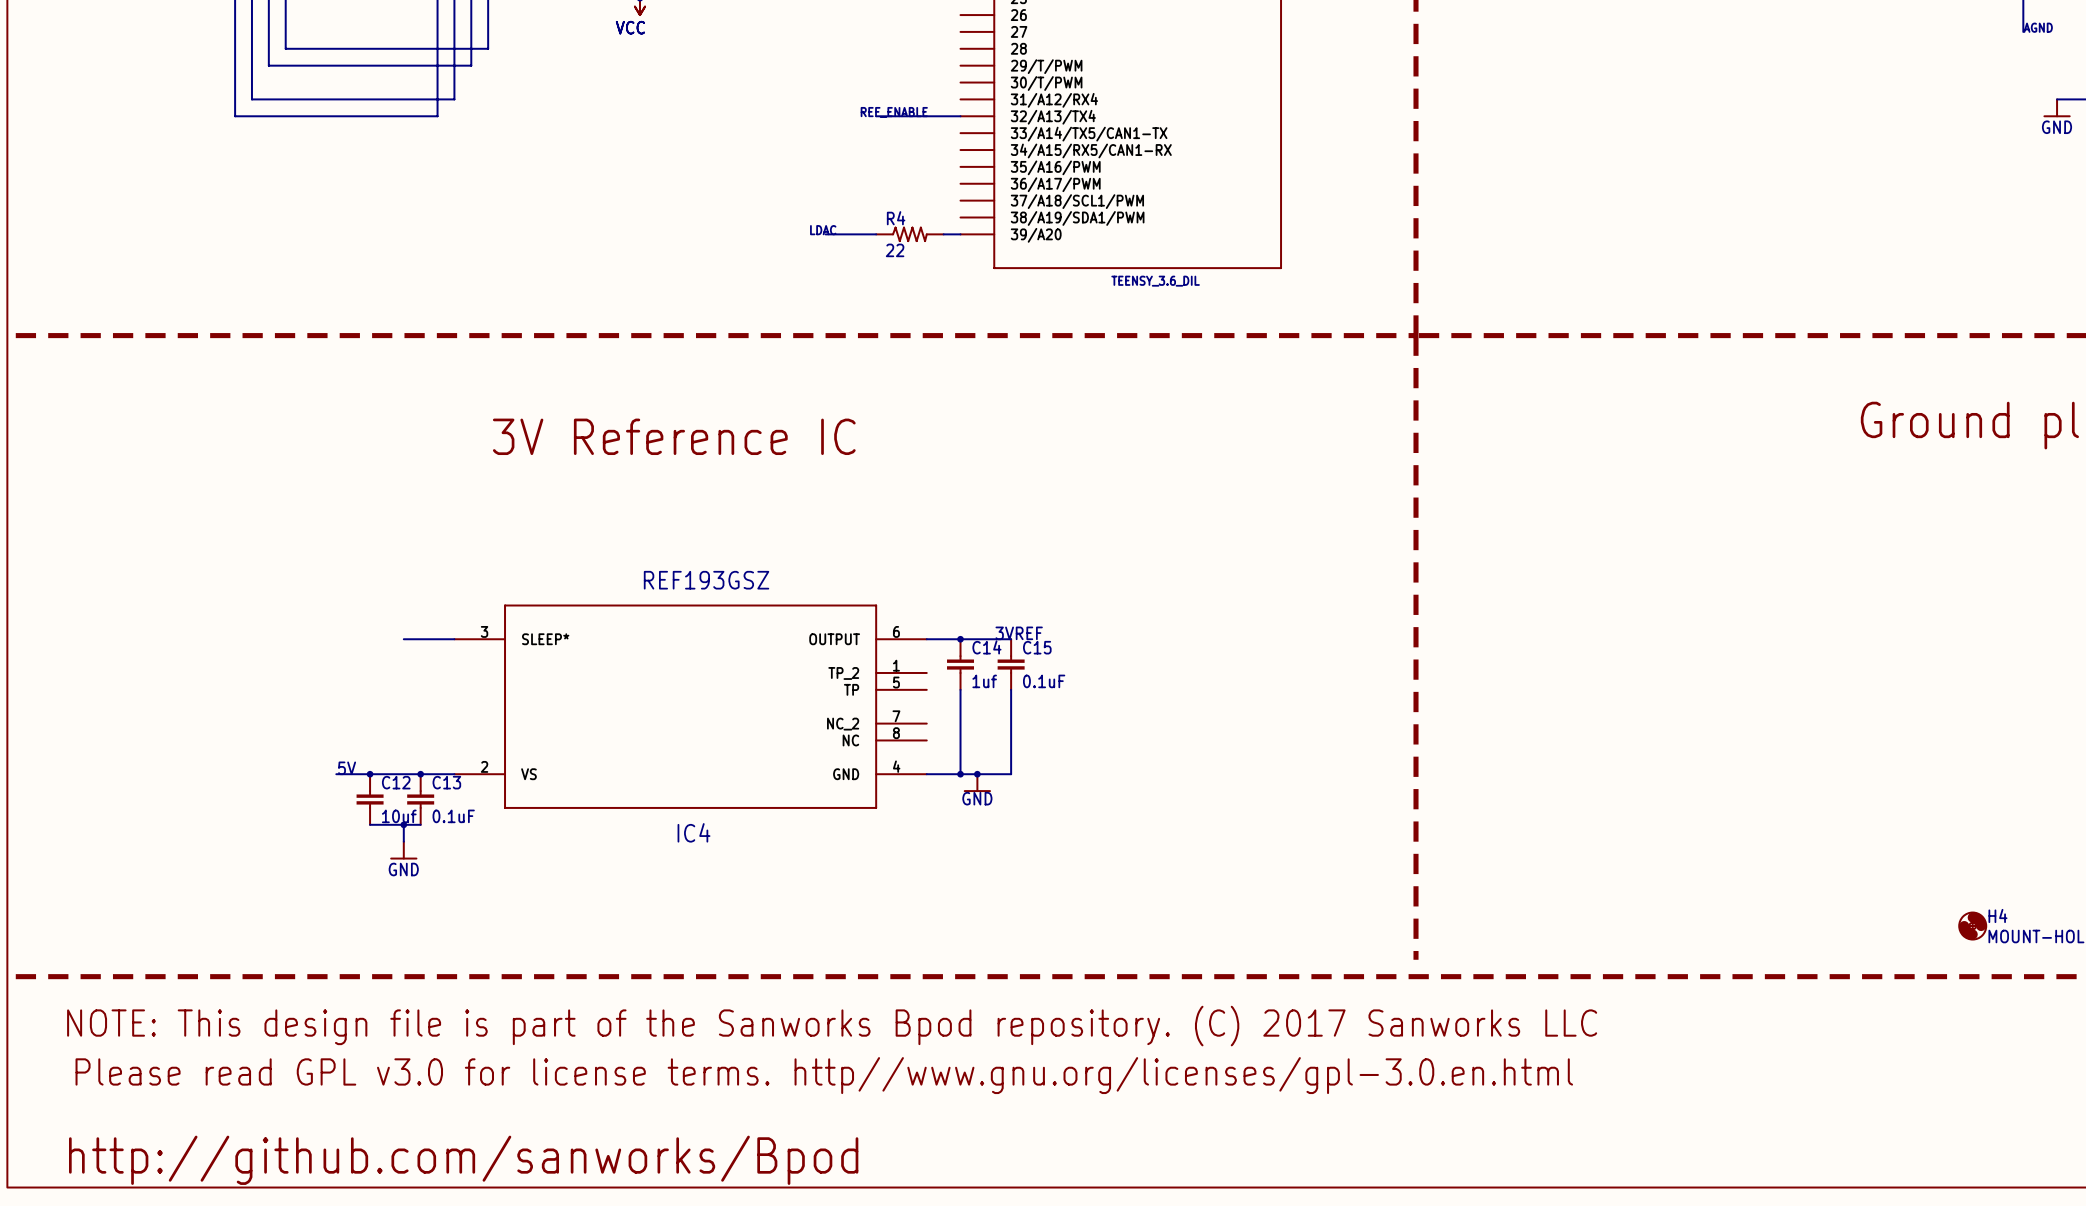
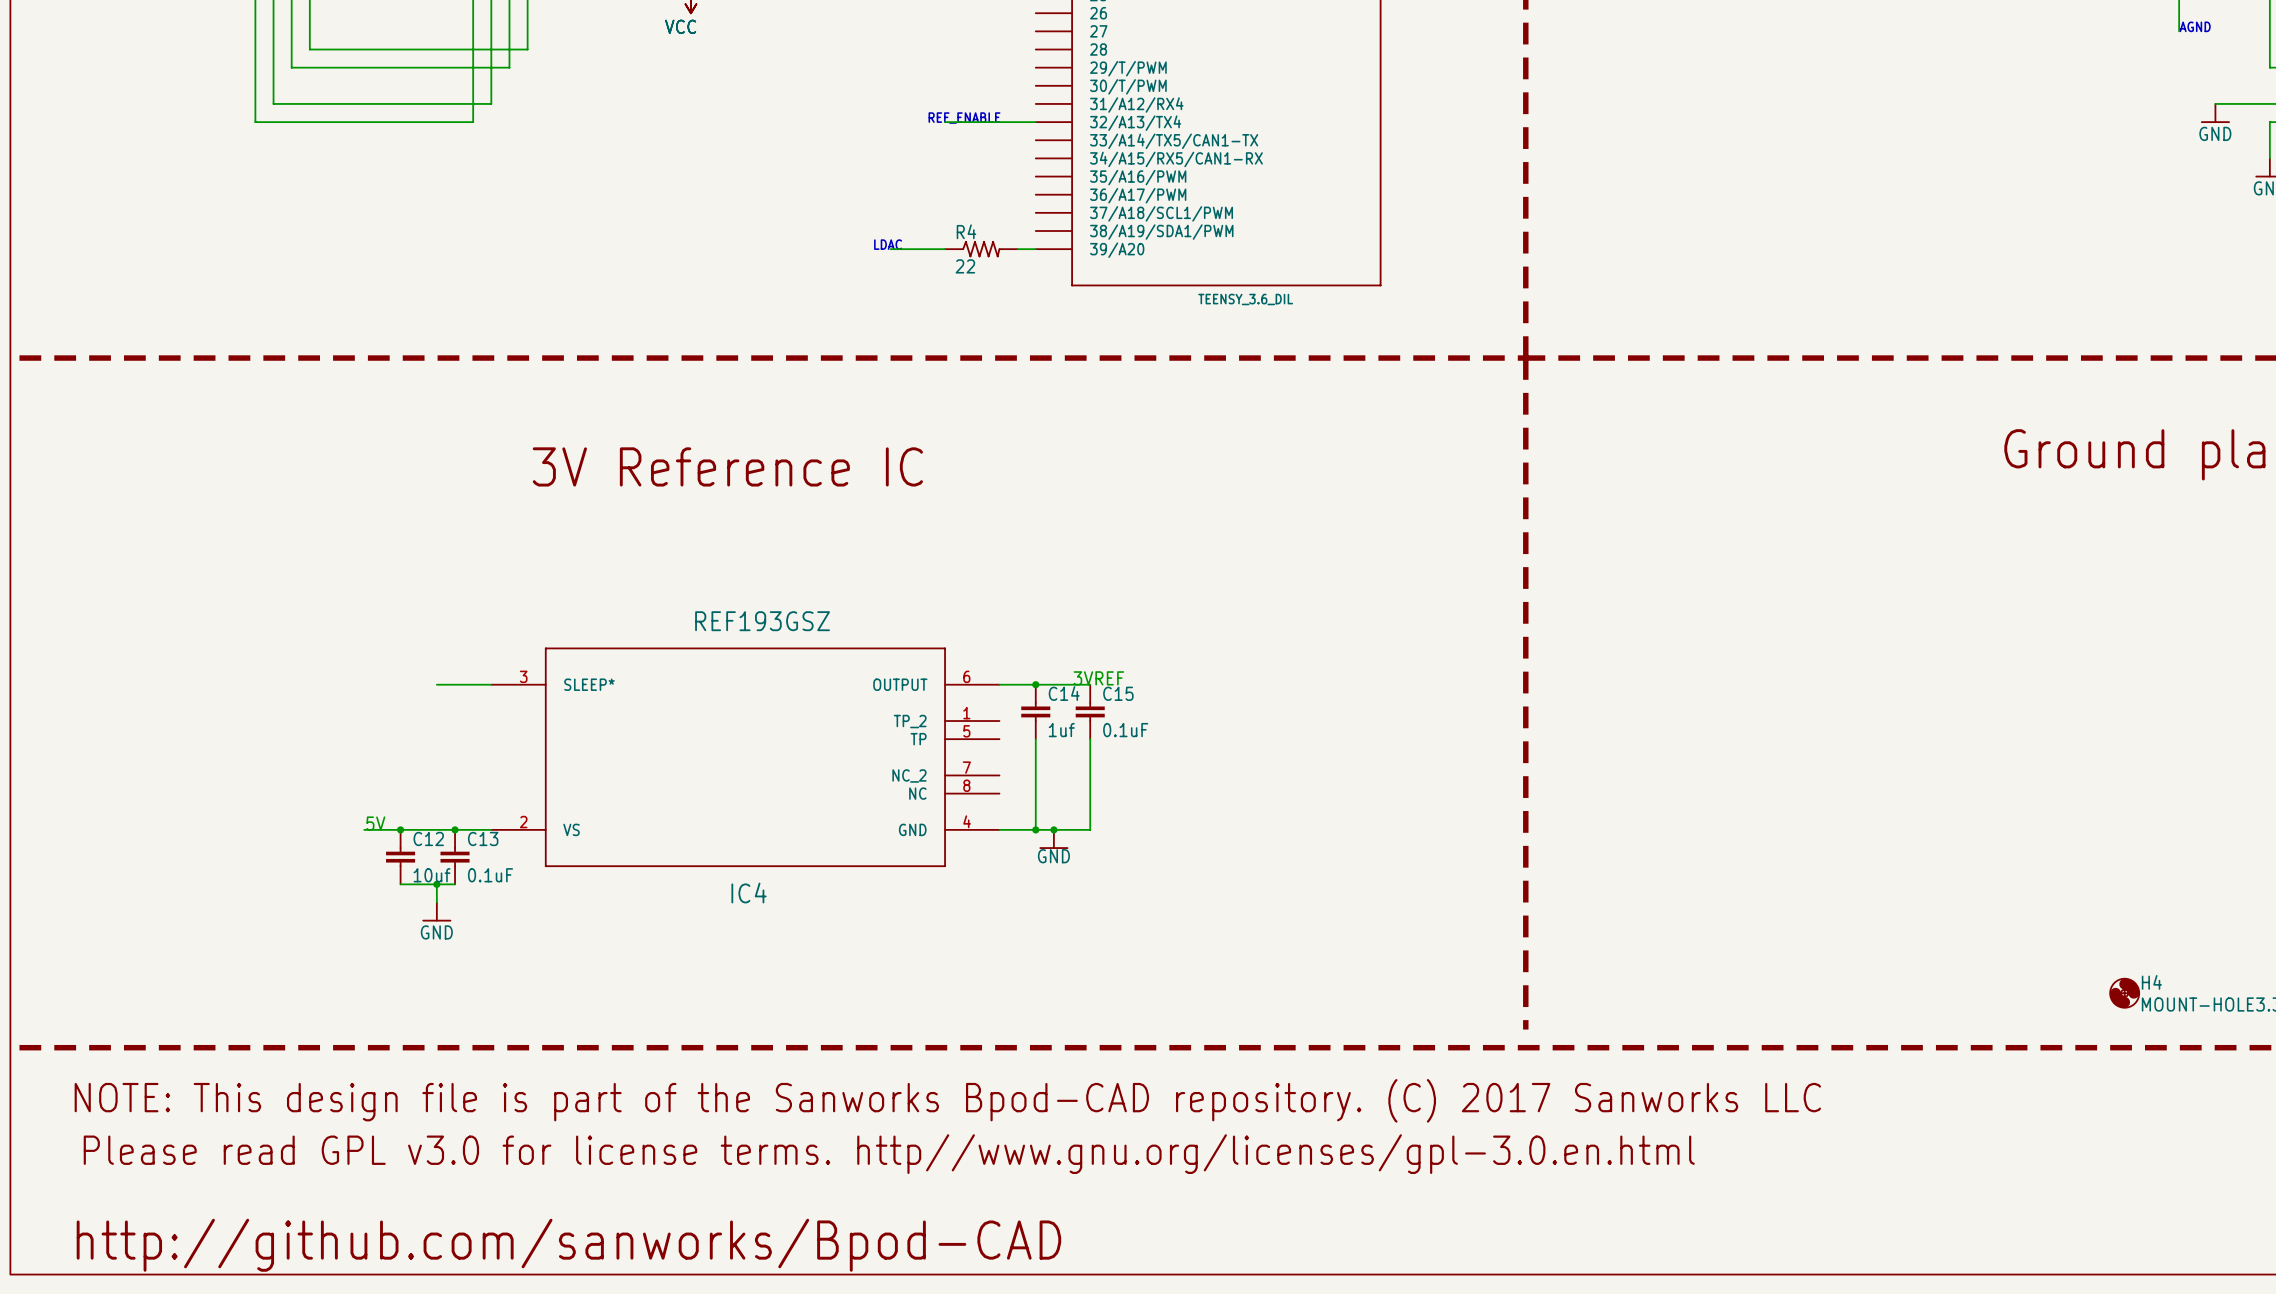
text: NOTE: This design file is part of the Sanworks Bpod repository. (C) 2017 Sanworks LLC (832, 1026) -> NOTE: This design file is part of the Sanworks Bpod-CAD repository. (C) 2017 Sanworks LLC (947, 1100)
text: http://github.com/sanworks/Bpod (463, 1160) -> http://github.com/sanworks/Bpod-CAD (568, 1245)

